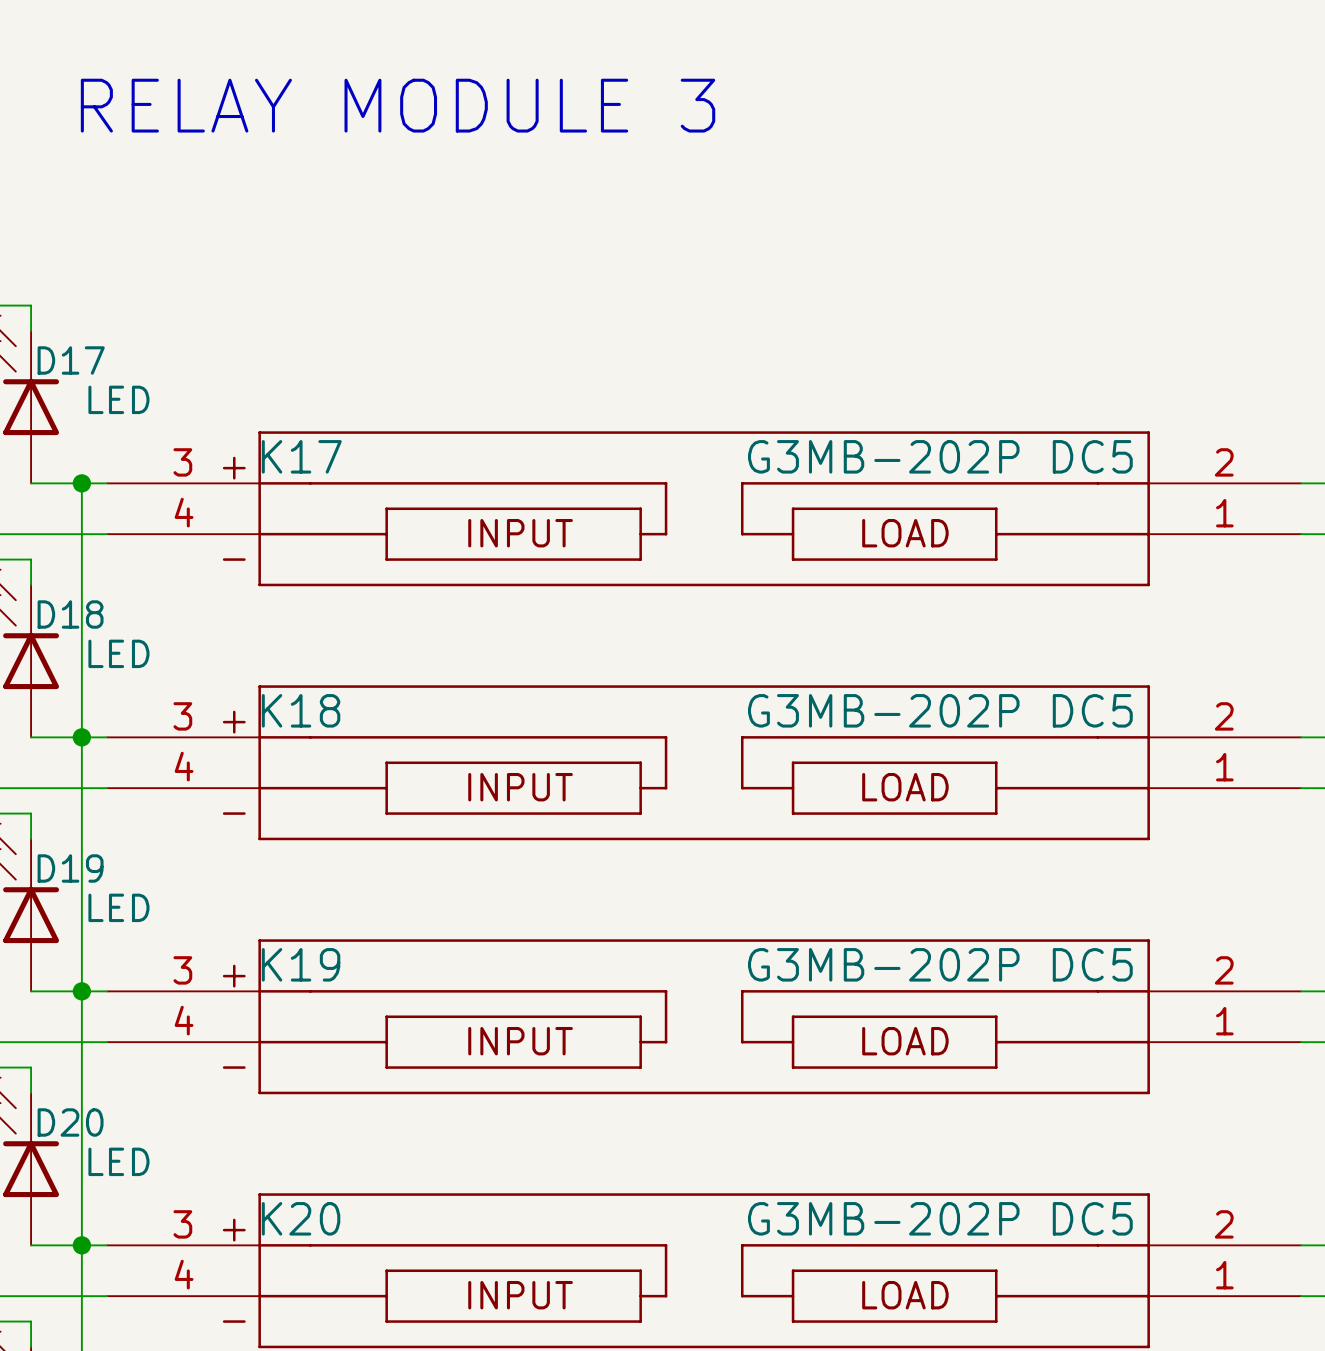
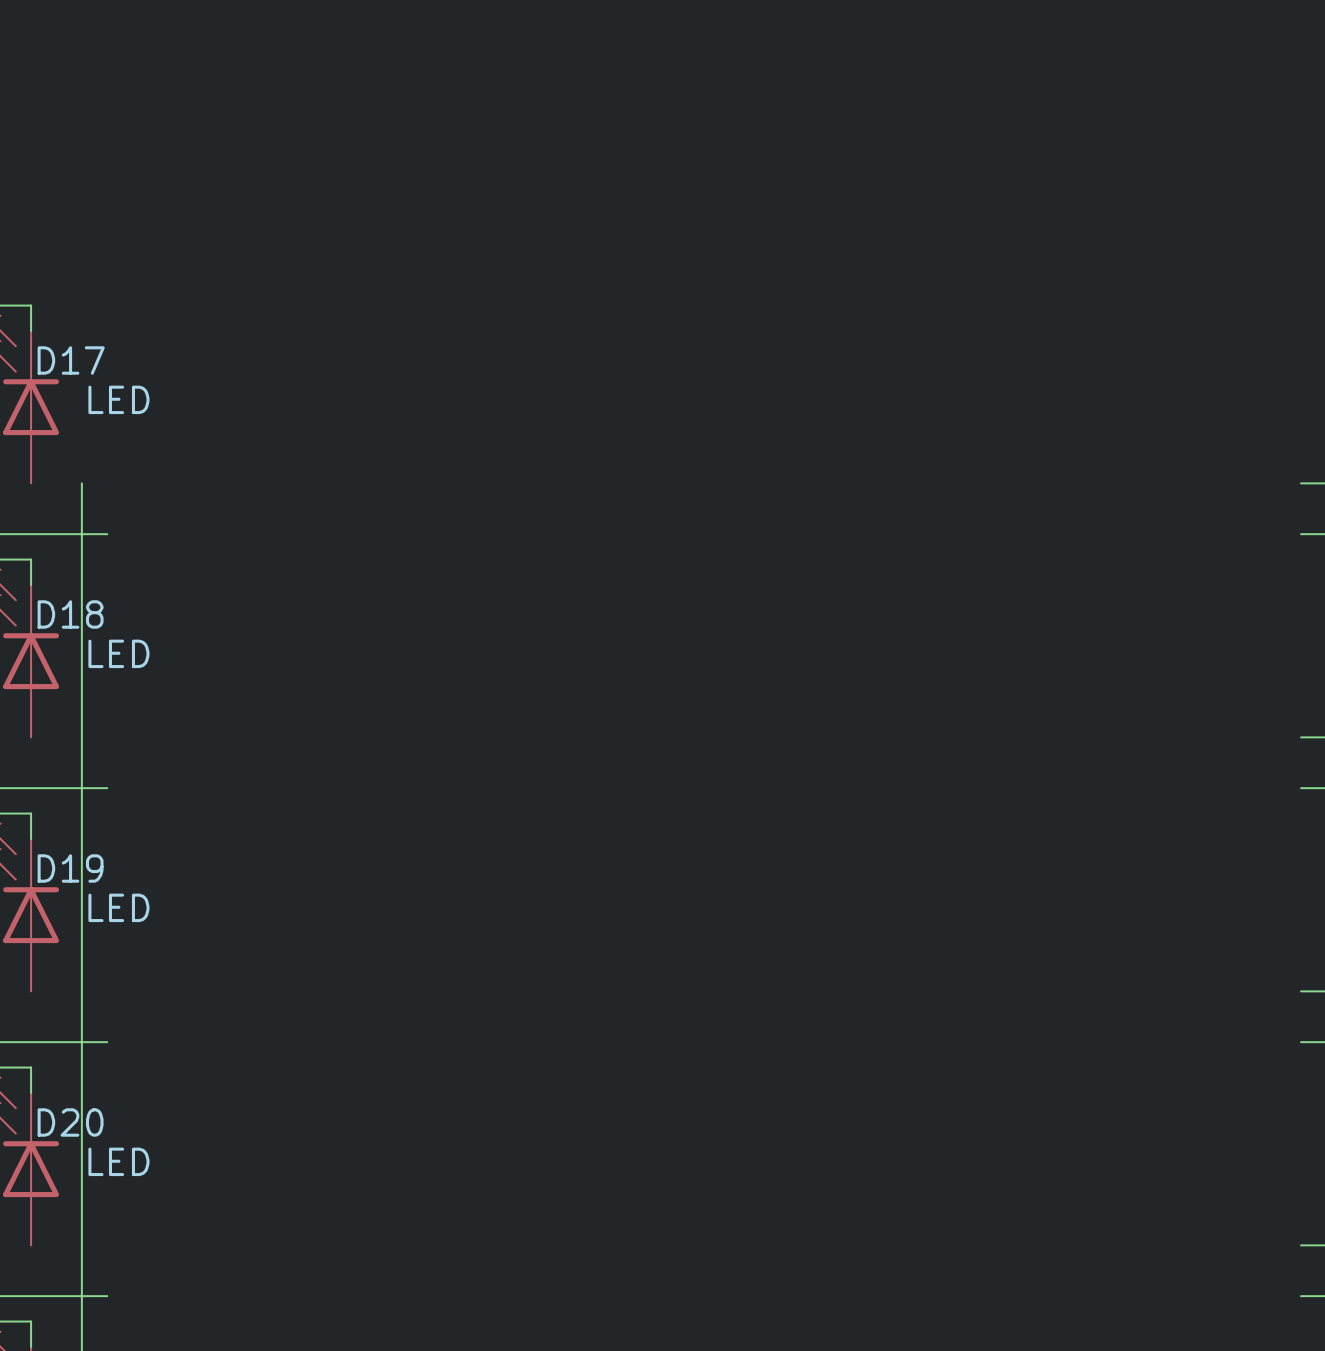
text: RELAY MODULE 3 (398, 105) -> none
wire: (31, 483) (107, 483) -> none
junction: (81, 483) -> none
K17: G3MB-202P DC5 (704, 508) -> none
wire: (31, 737) (107, 737) -> none
junction: (81, 737) -> none
K18: G3MB-202P DC5 (704, 762) -> none
wire: (31, 991) (107, 991) -> none
junction: (81, 991) -> none
K19: G3MB-202P DC5 (704, 1016) -> none
wire: (31, 1245) (107, 1245) -> none
junction: (81, 1245) -> none
K20: G3MB-202P DC5 (704, 1270) -> none

